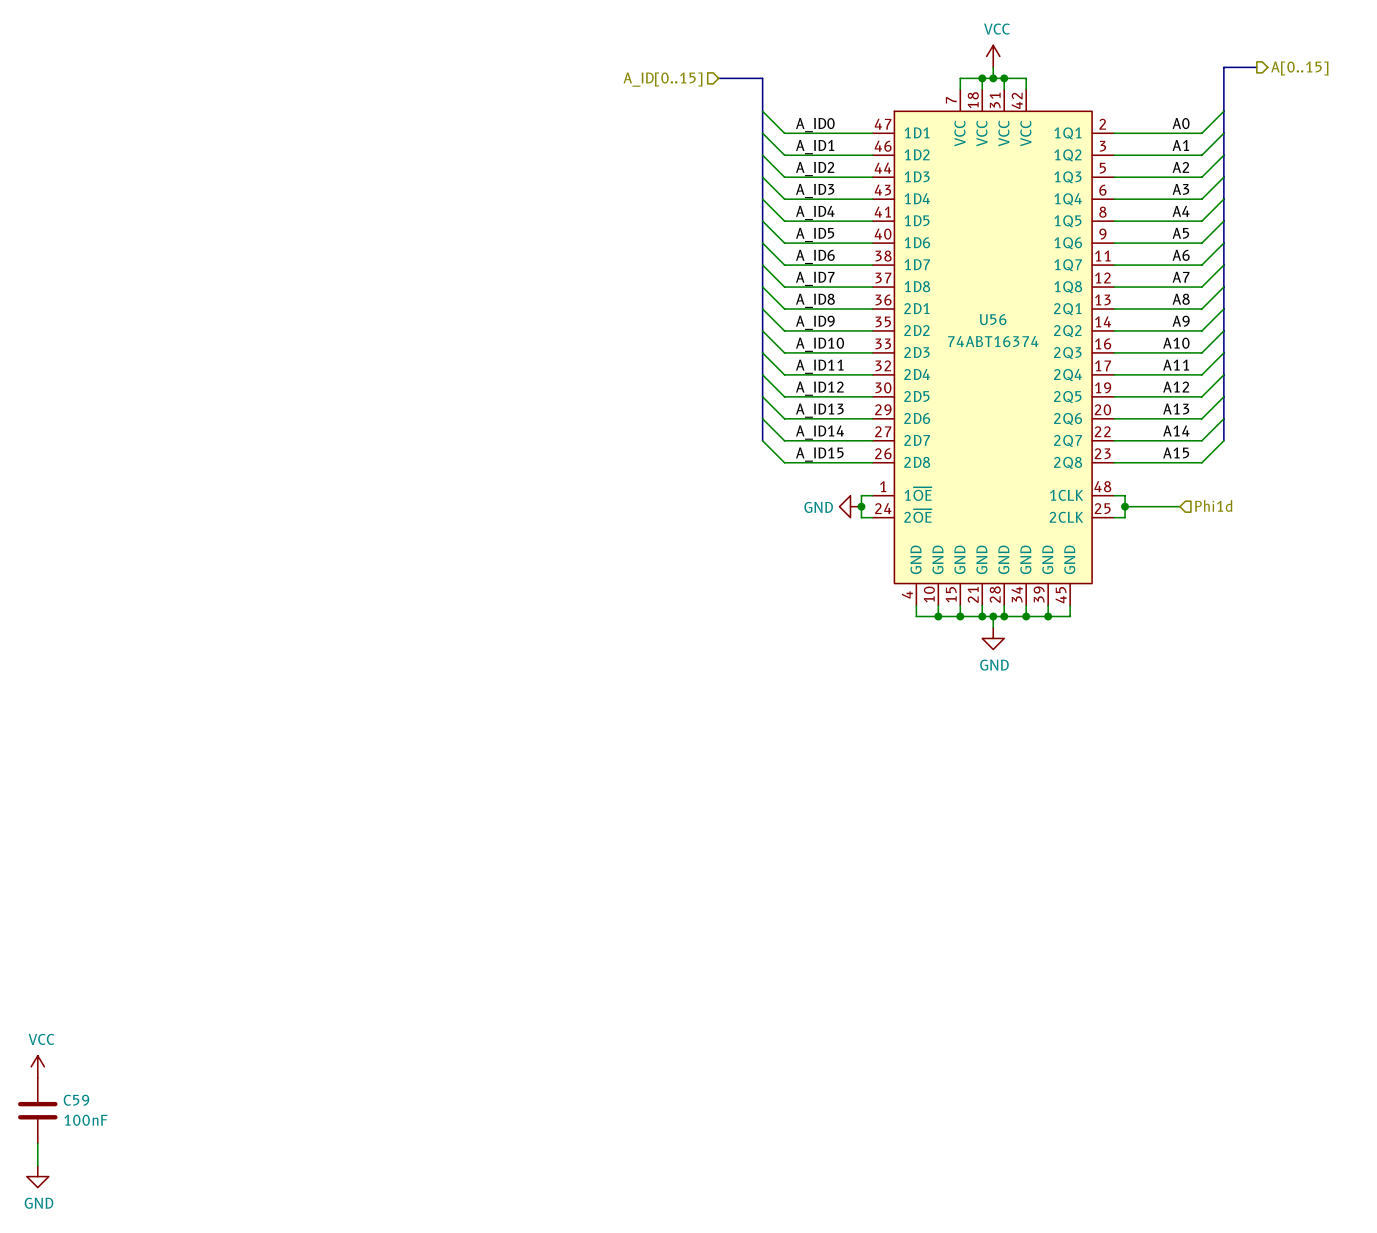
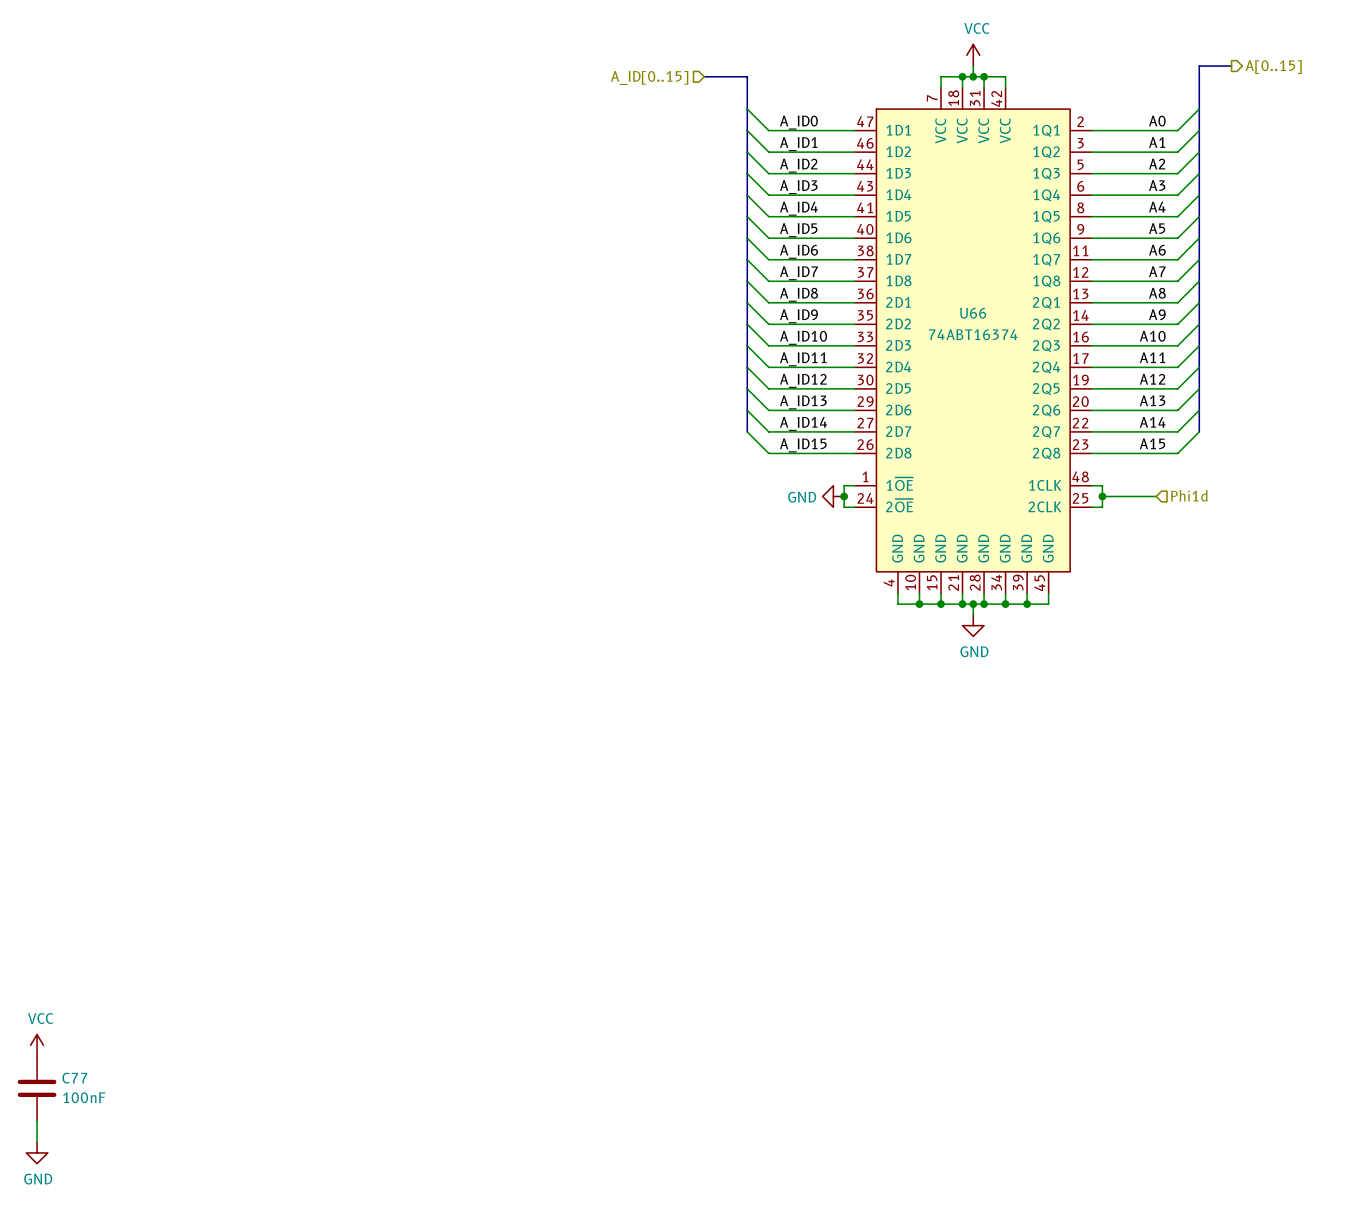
U56 name: U56 (993, 319) -> U66 (973, 313)
C59 name: C59 (76, 1100) -> C77 (74, 1078)

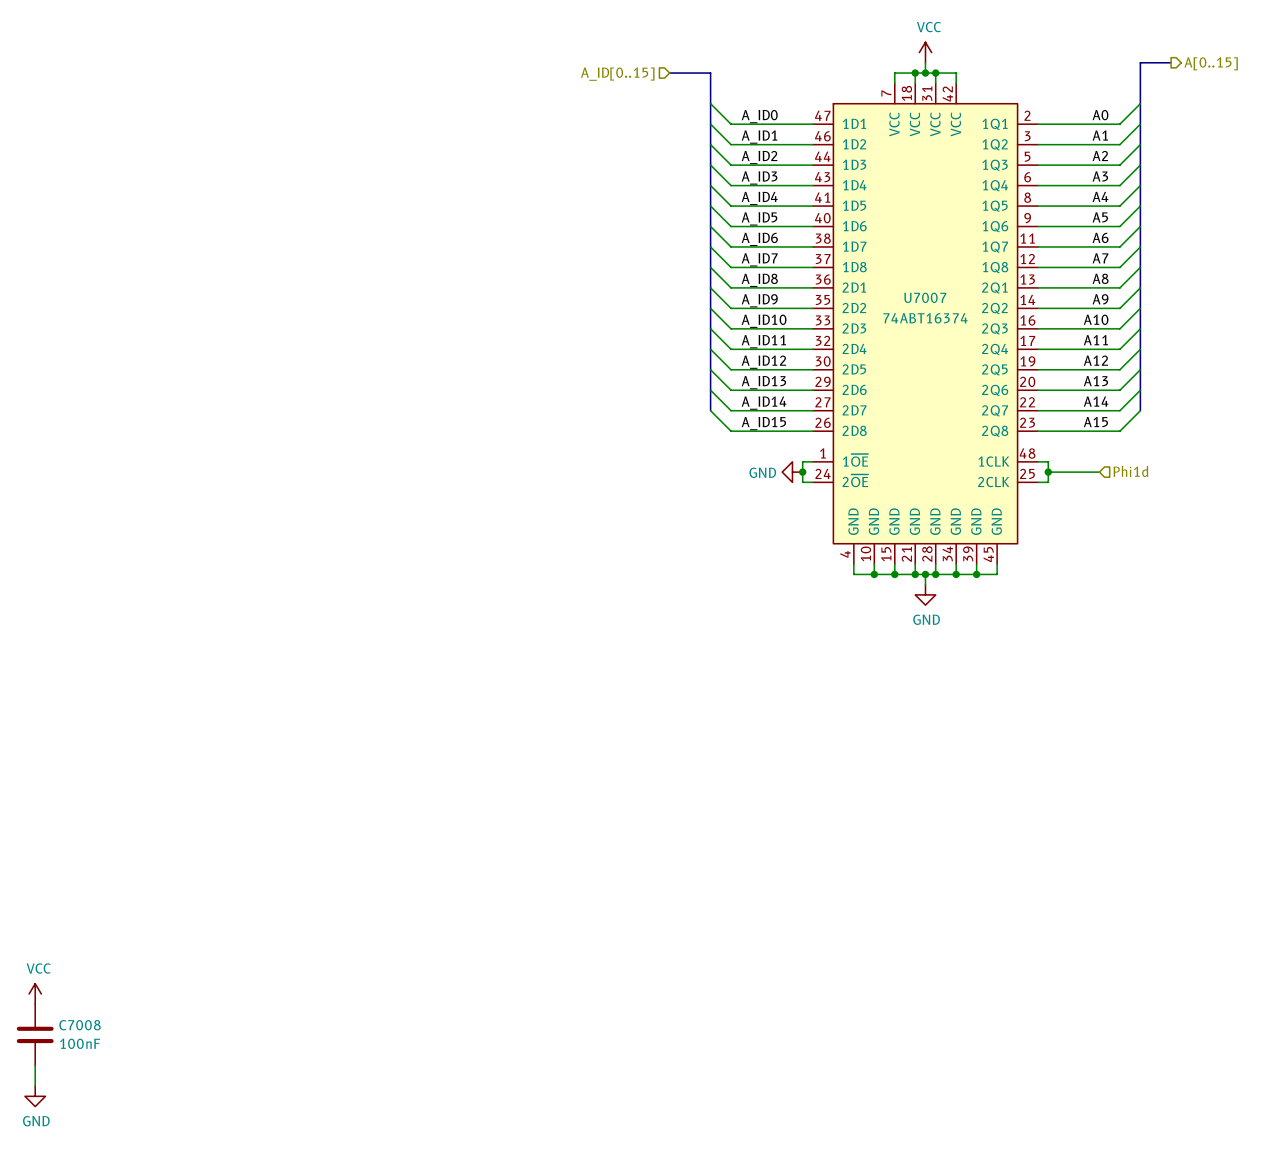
U66 name: U66 (973, 313) -> U7007 (925, 297)
C77 name: C77 (74, 1078) -> C7008 (80, 1025)

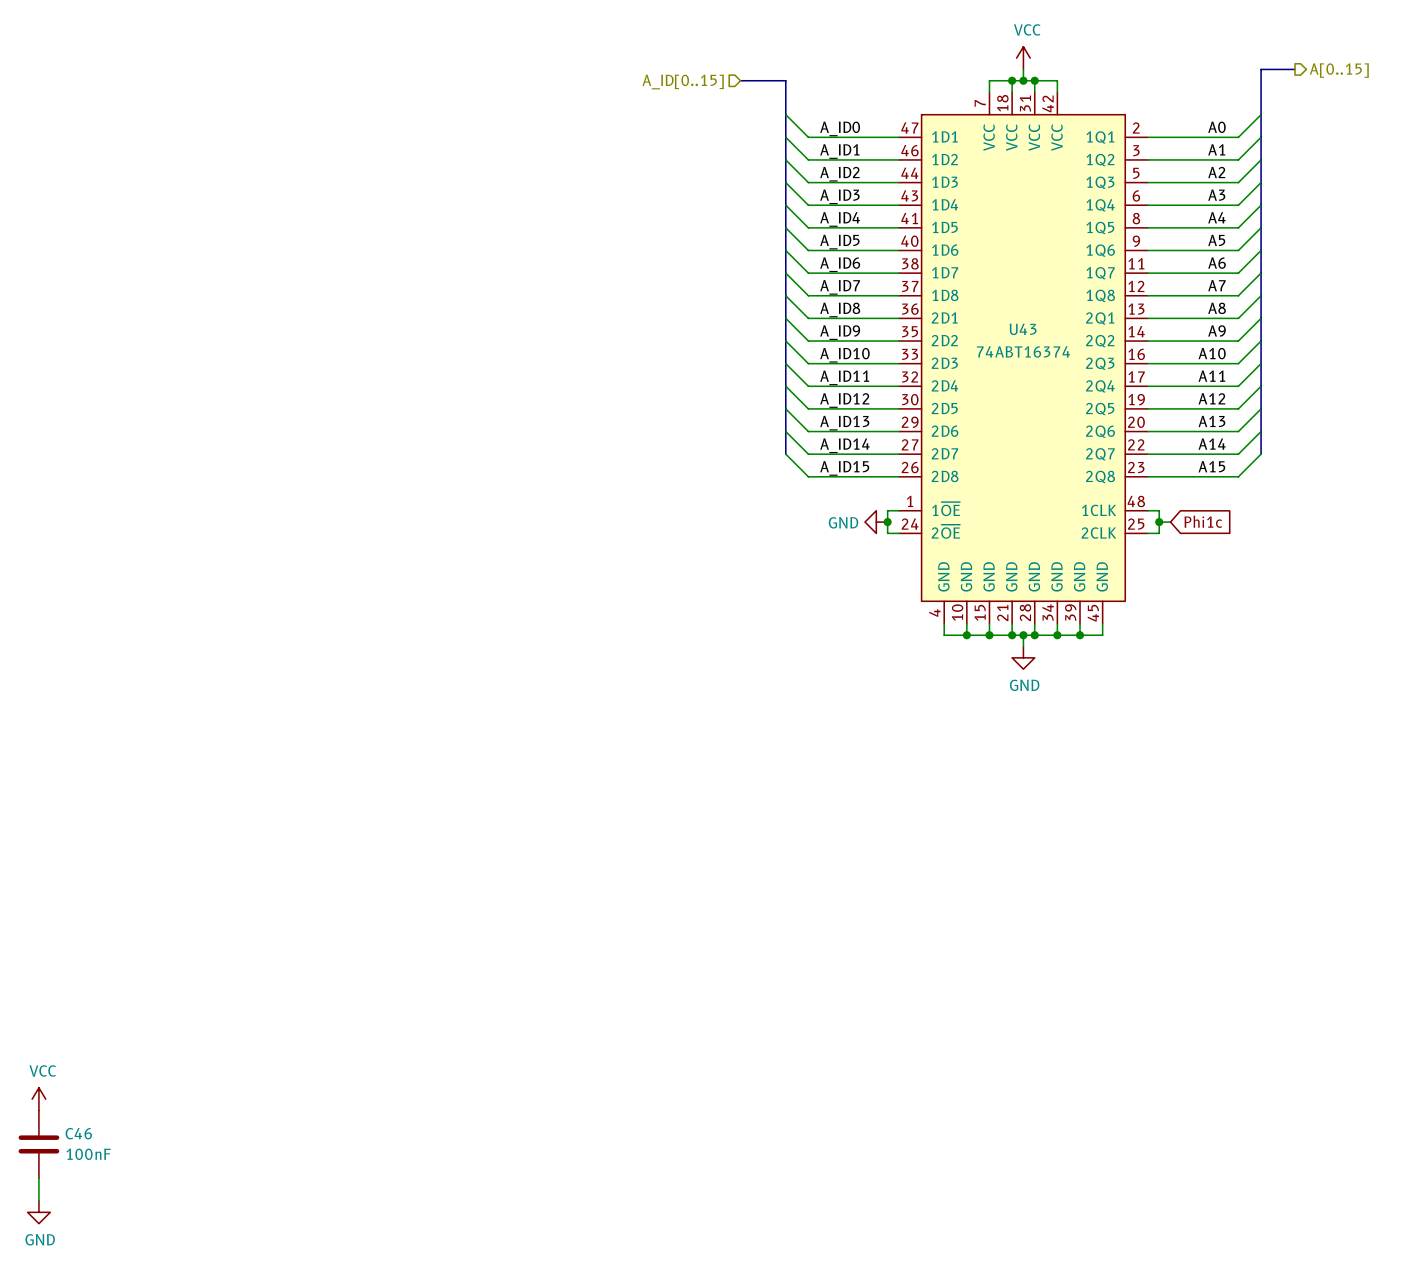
U7007 name: U7007 (925, 297) -> U43 (1023, 329)
global label: none -> Phi1c (1203, 521)
hierarchical label: Phi1d (1130, 471) -> none
wire: (1058, 472) (1099, 472) -> none
C7008 name: C7008 (80, 1025) -> C46 (78, 1133)

